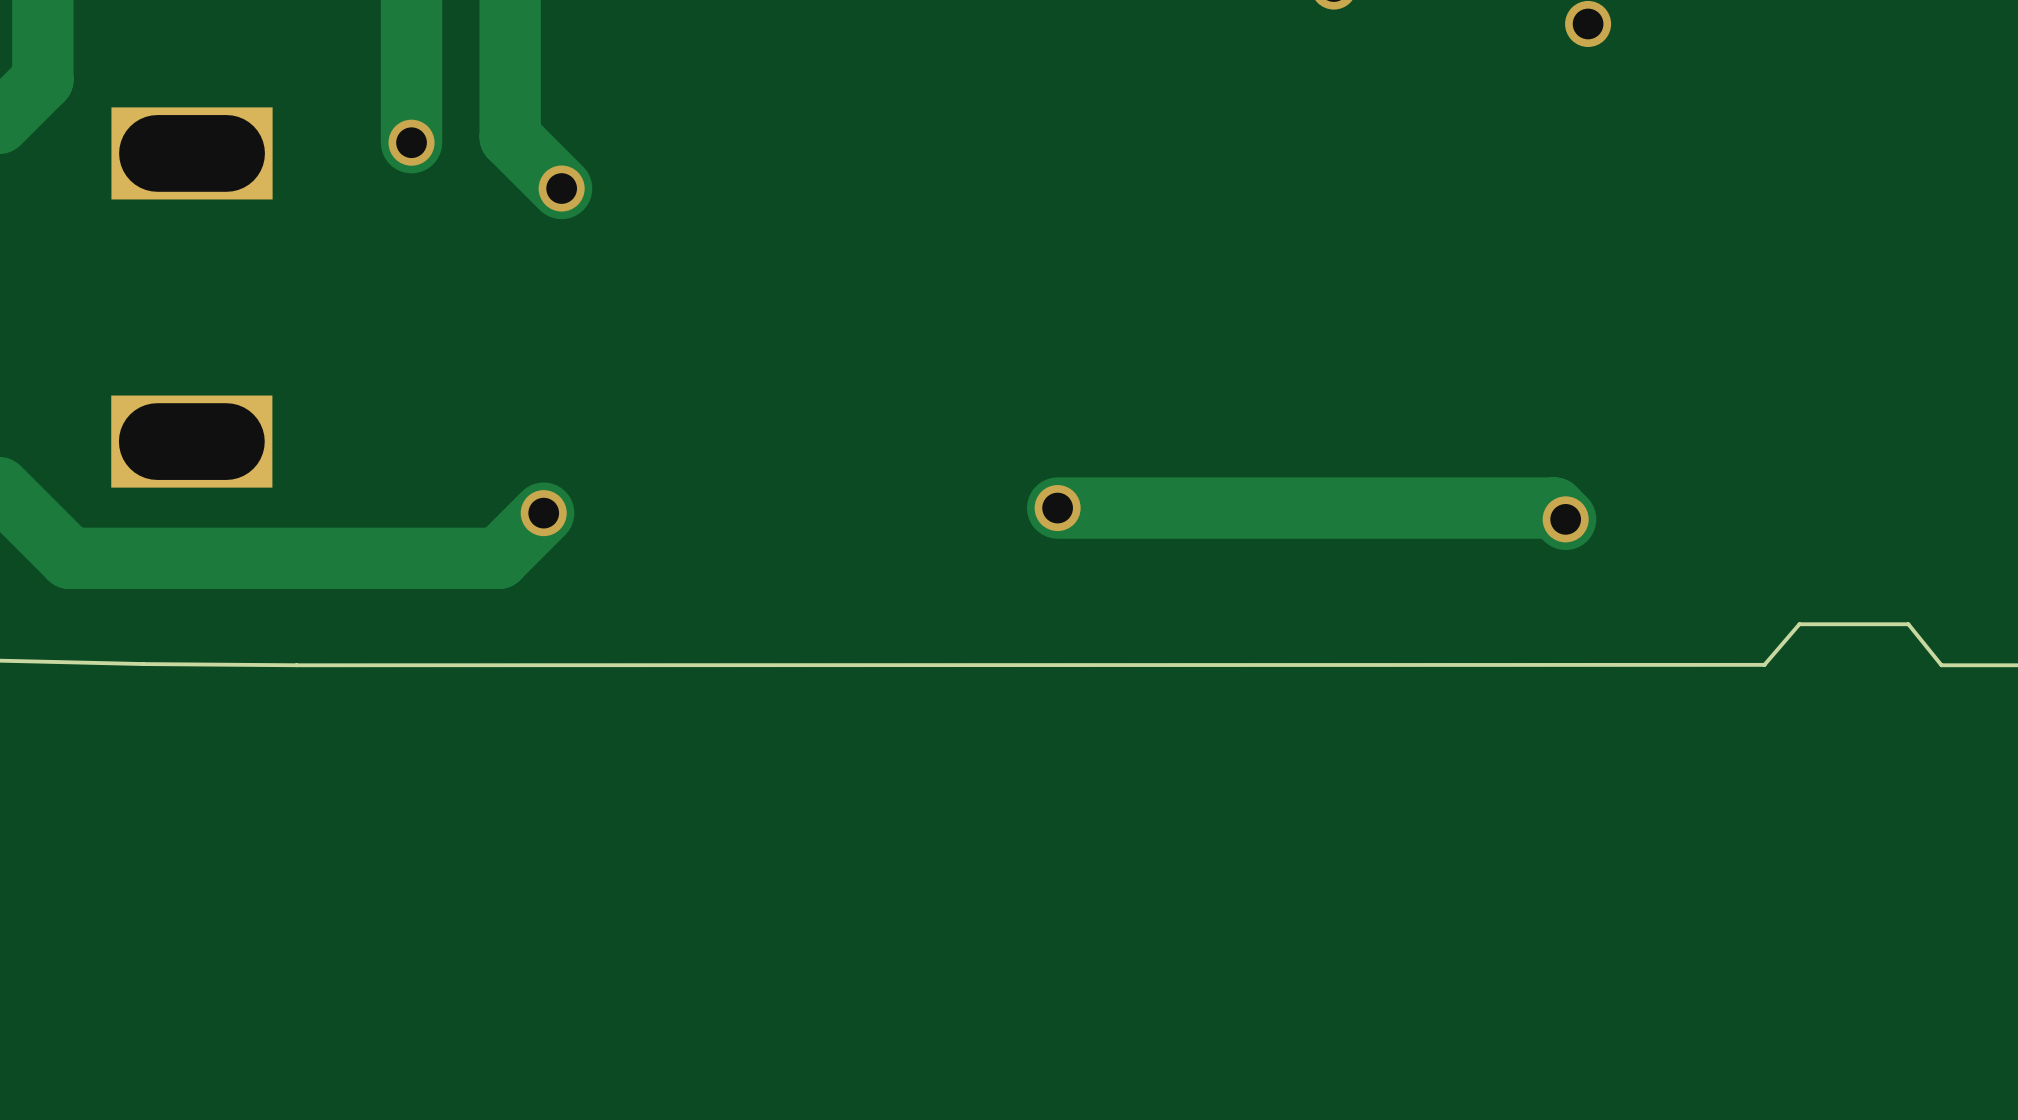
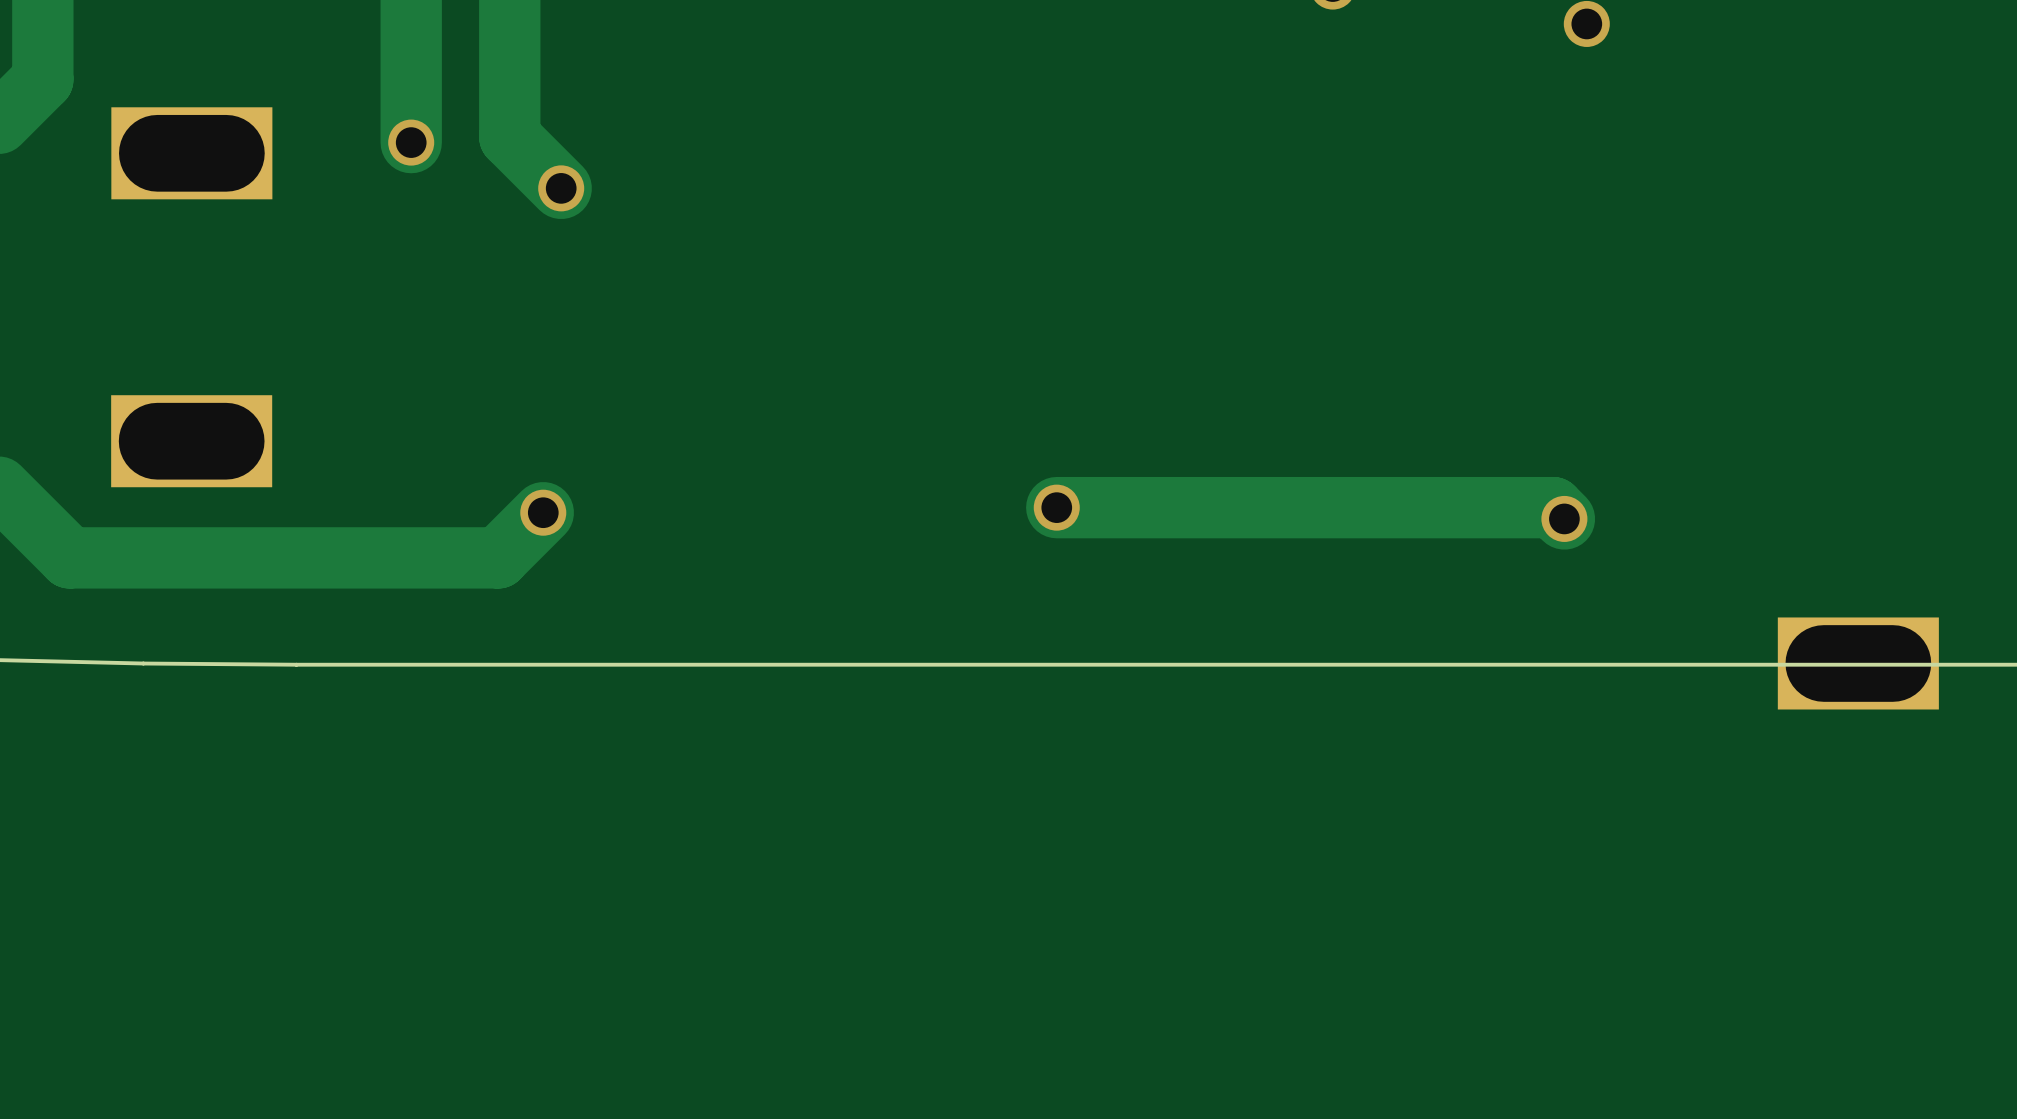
part: none -> (1858, 663)
board edge: (1941, 665) (1908, 624) (1799, 624) (1764, 664) (296, 665) -> (1939, 664) (296, 664)

